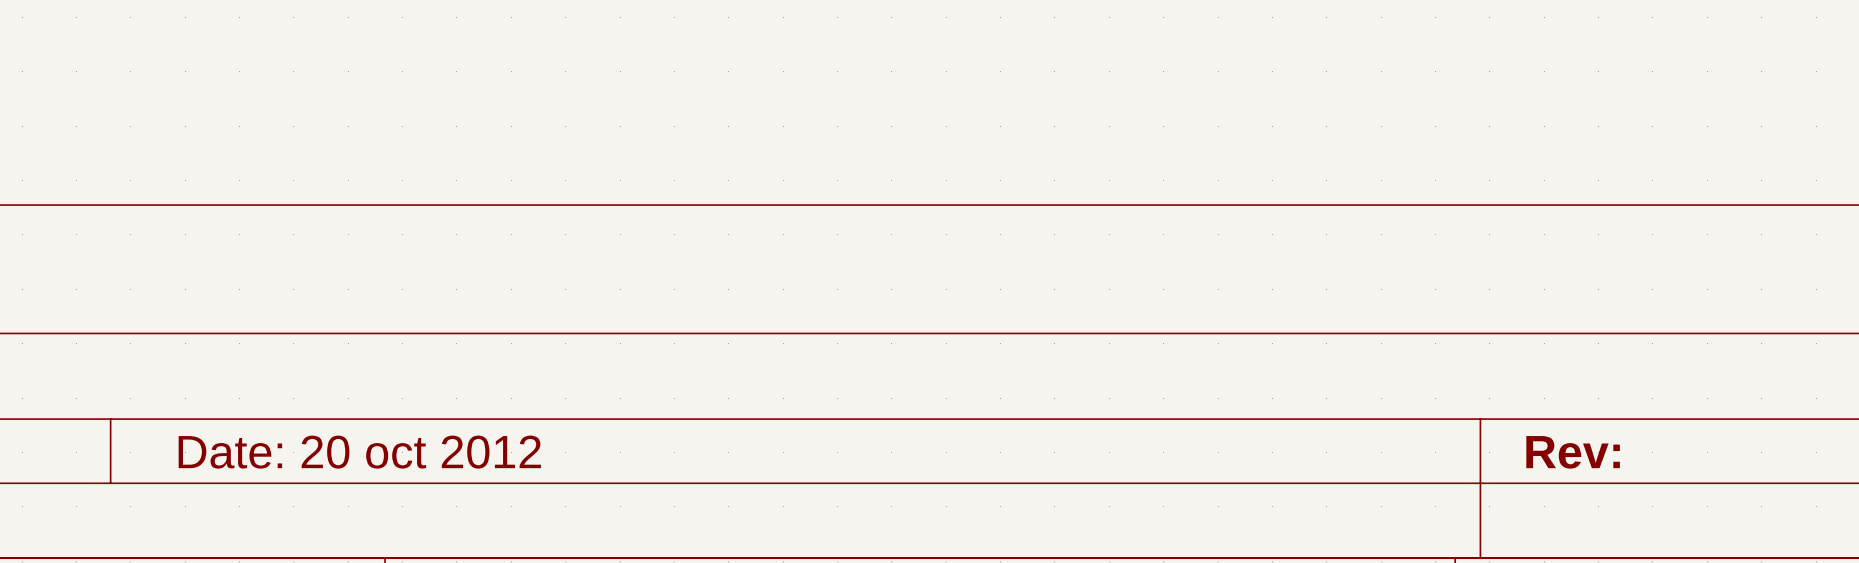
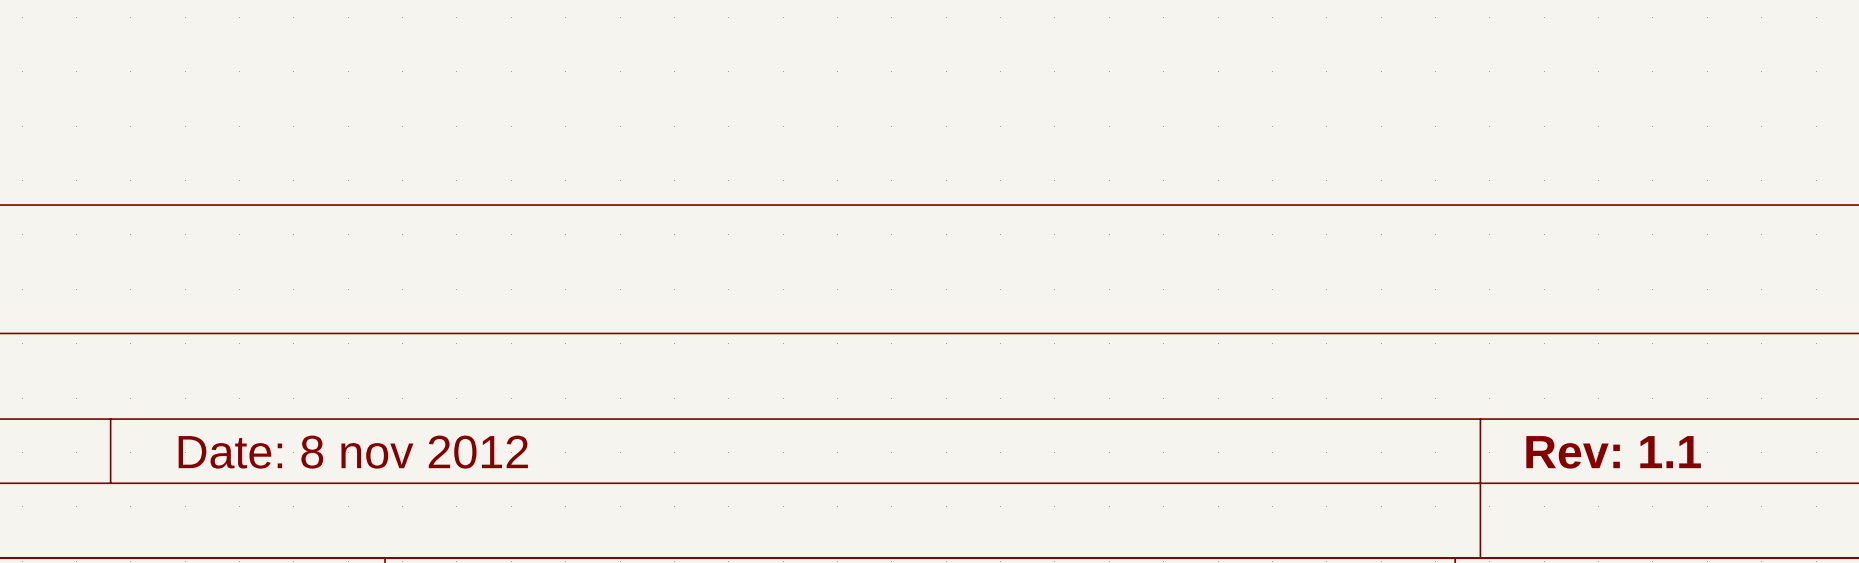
title block: Date: 20 oct 2012 (359, 452) -> Date: 8 nov 2012 (353, 452)
title block: Rev: (1573, 452) -> Rev: 1.1 (1613, 452)

